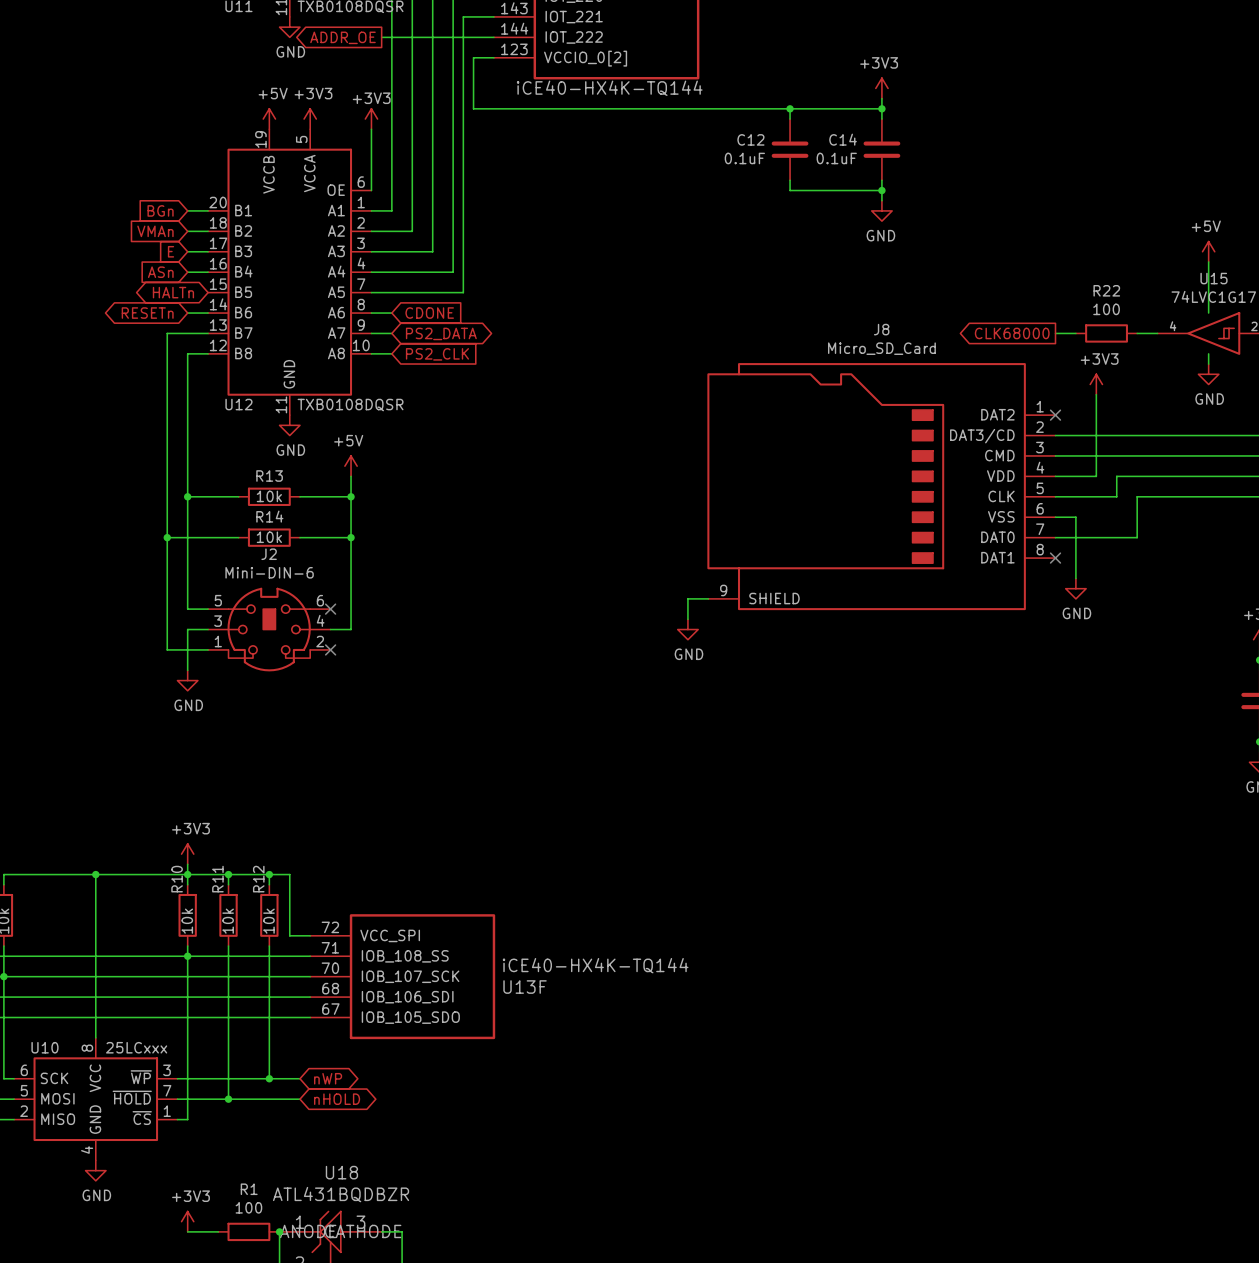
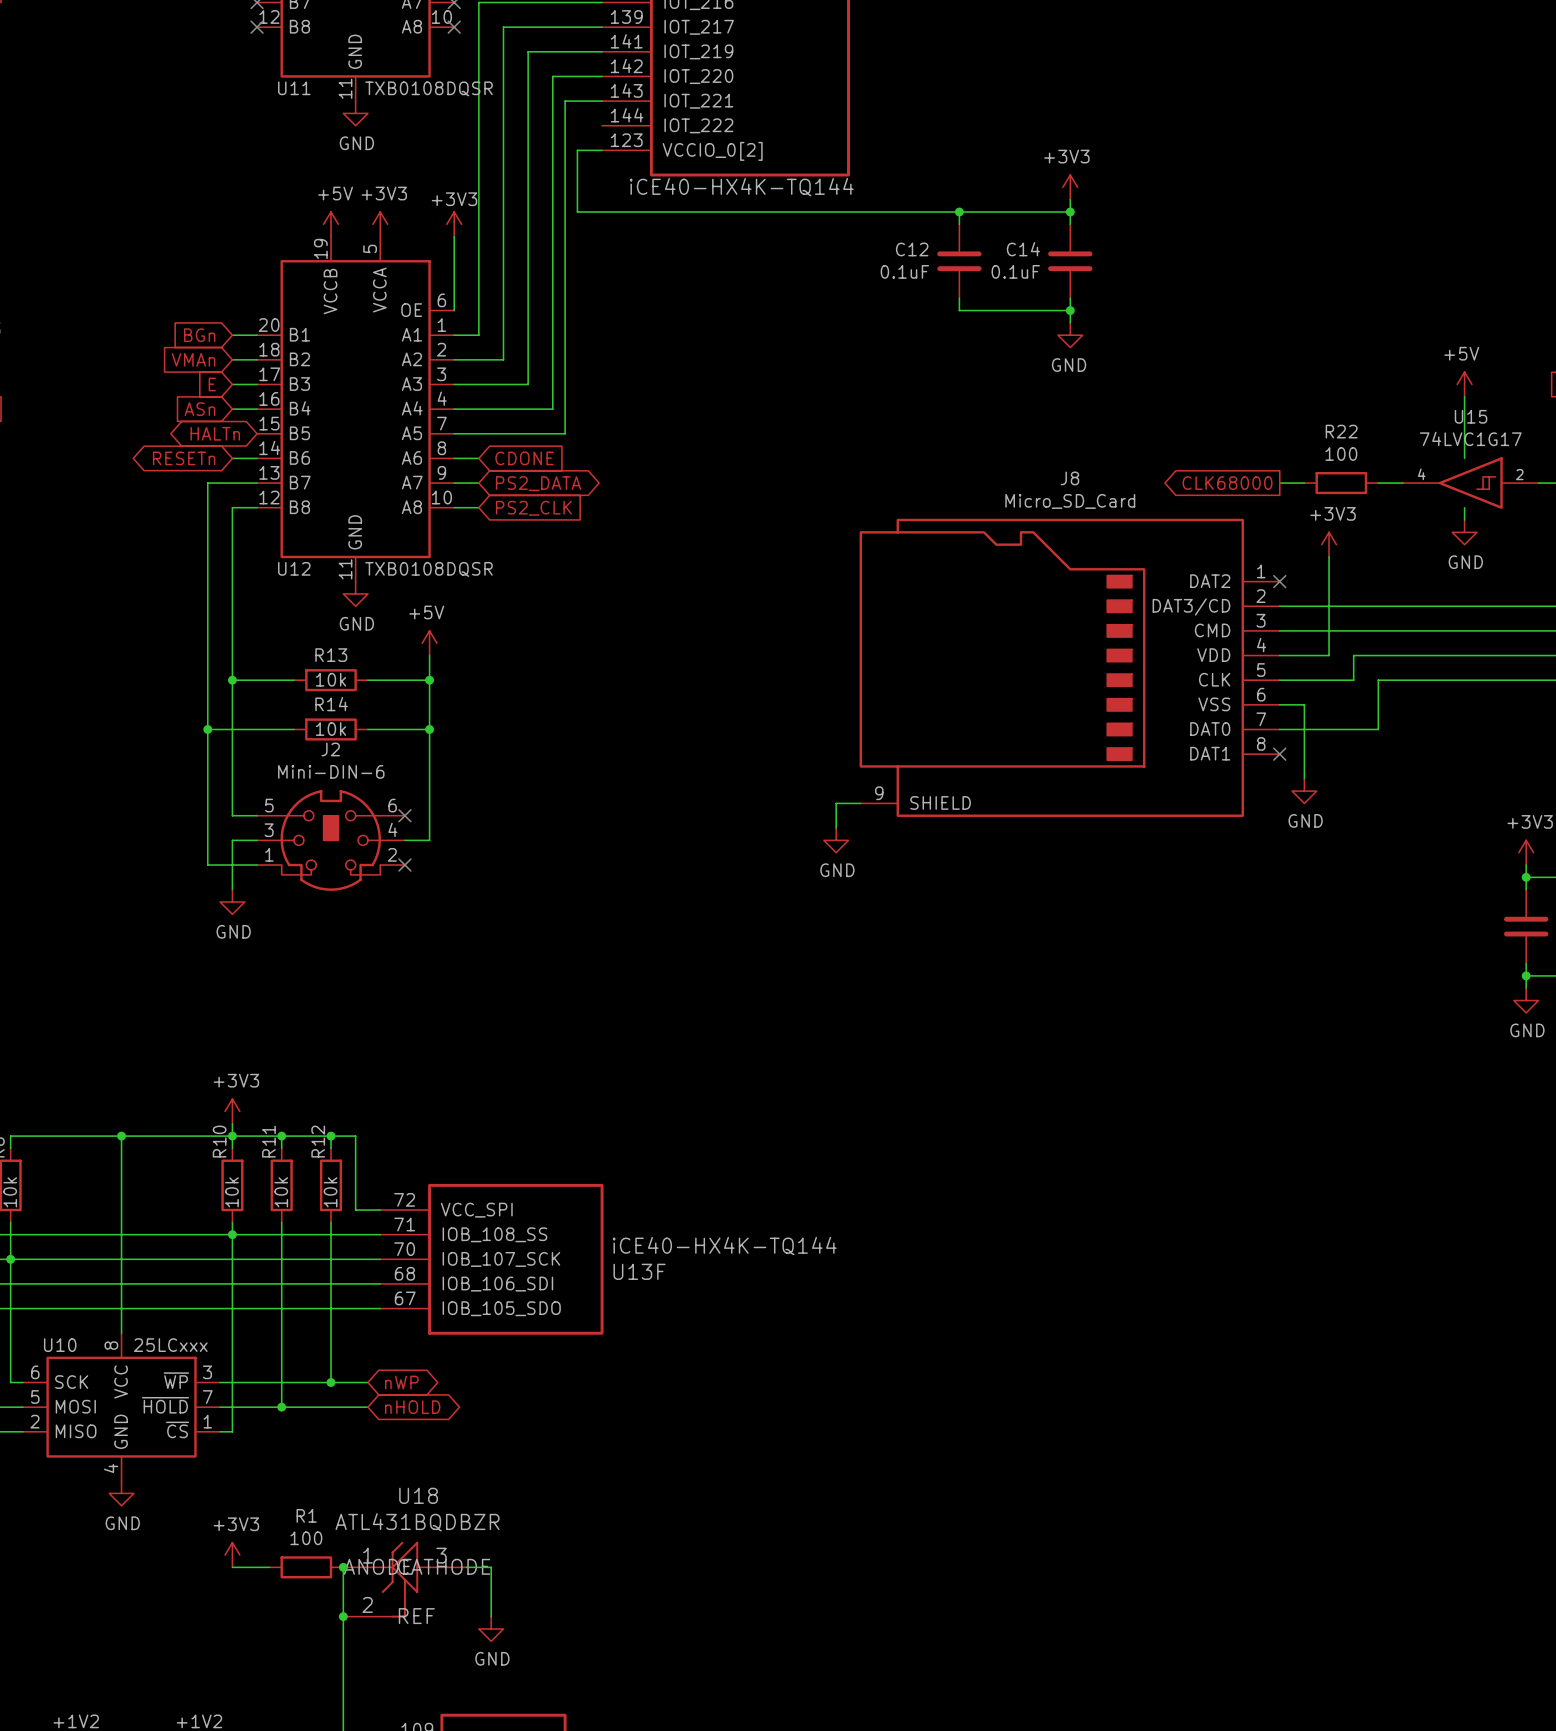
global label: ADDR_OE (342, 37) -> none
wire: (381, 37) (493, 37) -> none

